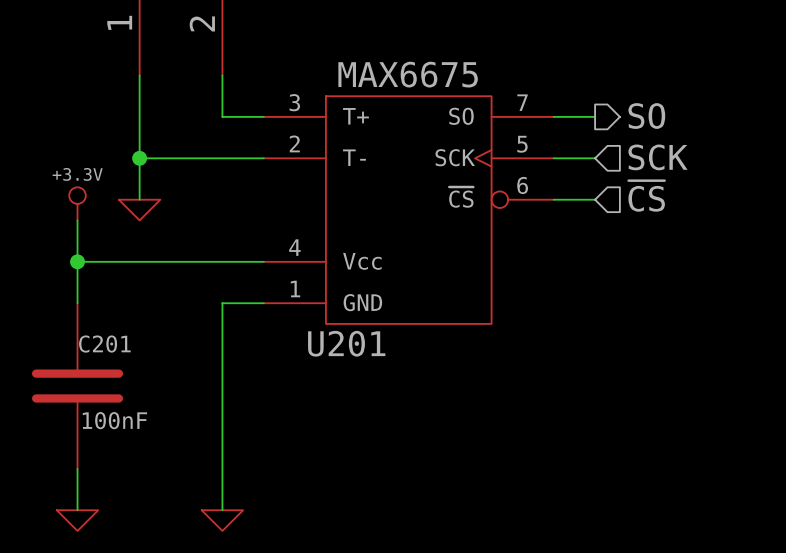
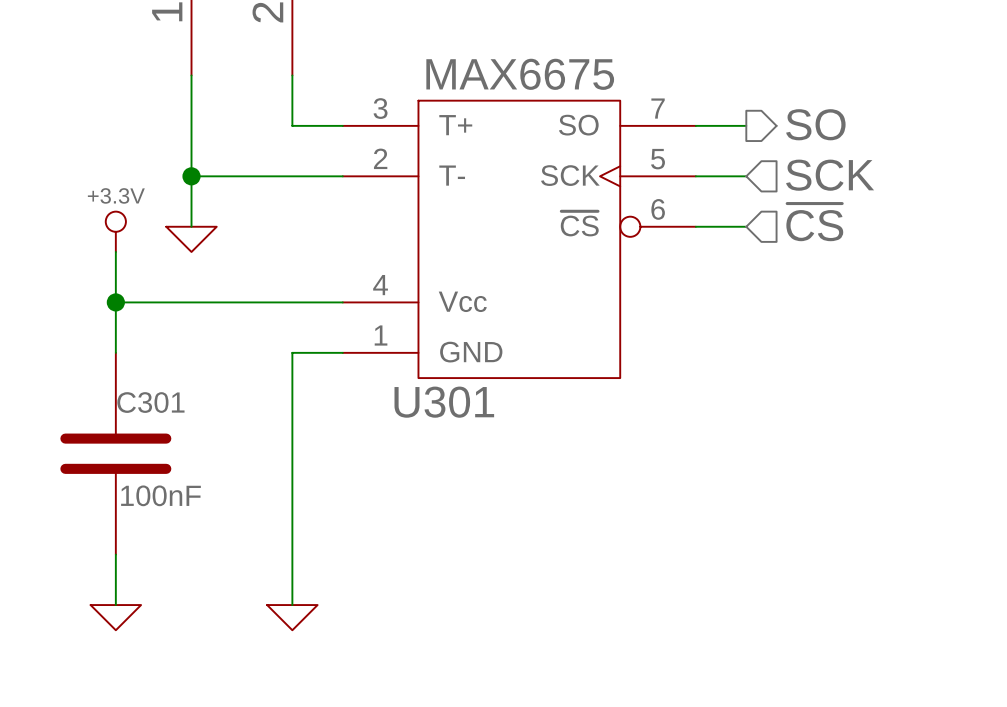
U201 name: U201 (346, 343) -> U301 (444, 402)
C201 name: C201 (104, 344) -> C301 (150, 402)

